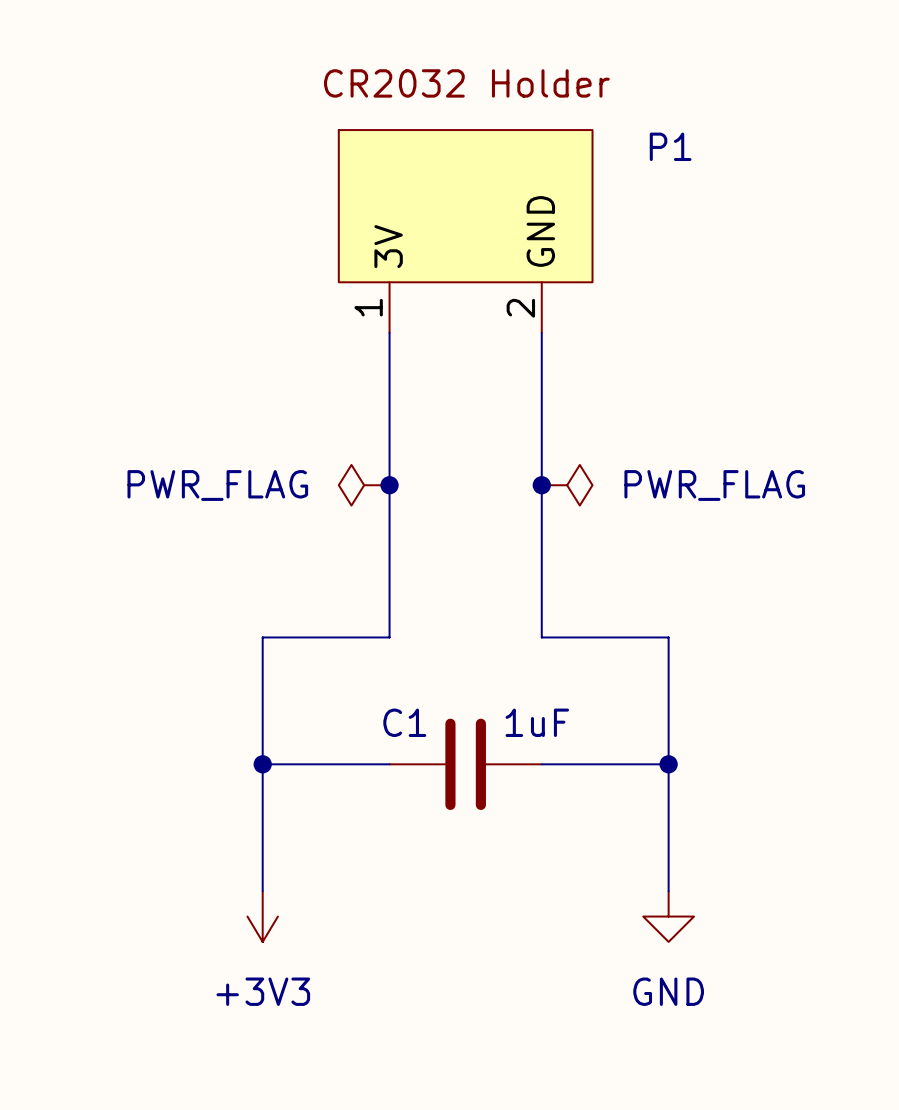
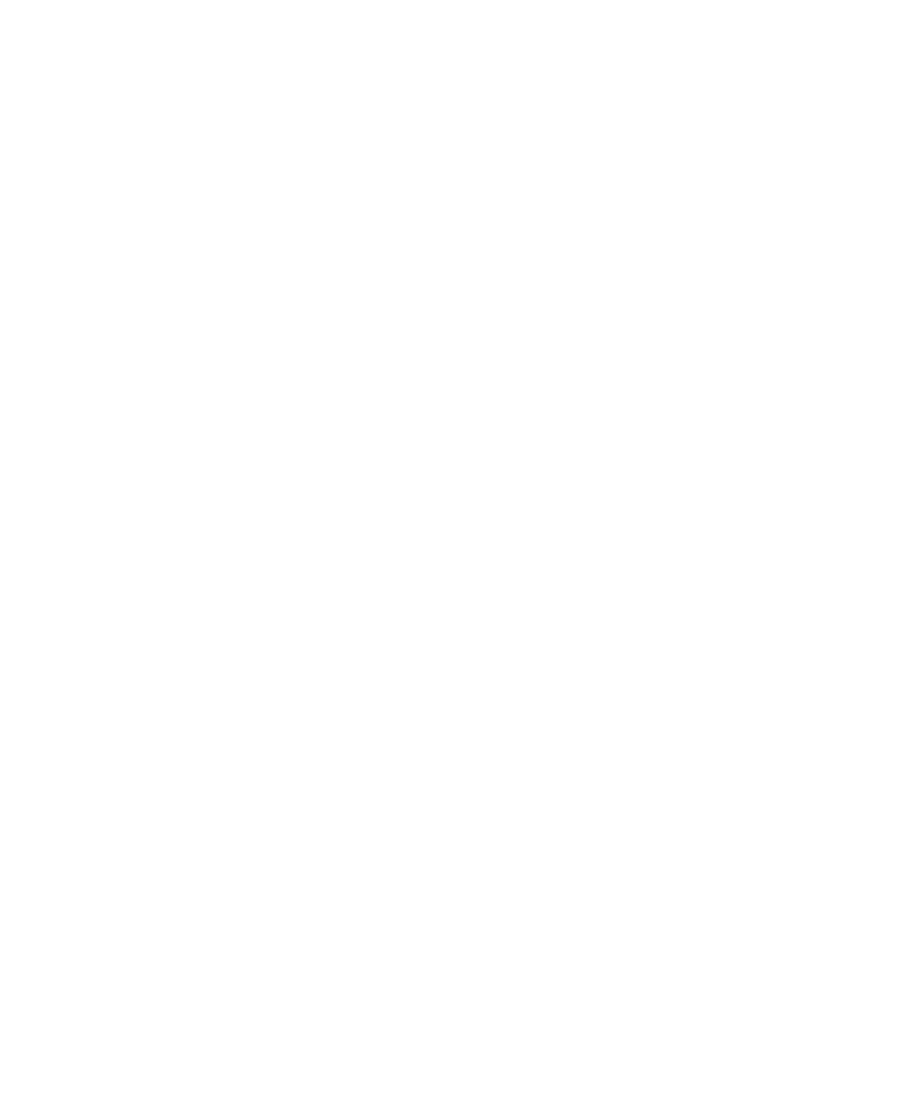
P1: (465, 231) -> none
wire: (389, 333) (389, 637) (262, 637) (262, 891) -> none
wire: (541, 333) (541, 637) (668, 637) (668, 891) -> none
power symbol: PWR_FLAG (364, 485) -> none
junction: (389, 485) -> none
junction: (541, 485) -> none
power symbol: PWR_FLAG (567, 485) -> none
wire: (262, 764) (389, 764) -> none
junction: (262, 764) -> none
C1: 1uF (465, 764) -> none
wire: (541, 764) (668, 764) -> none
junction: (668, 764) -> none
power symbol: +3V3 (262, 916) -> none
power symbol: GND (668, 916) -> none

